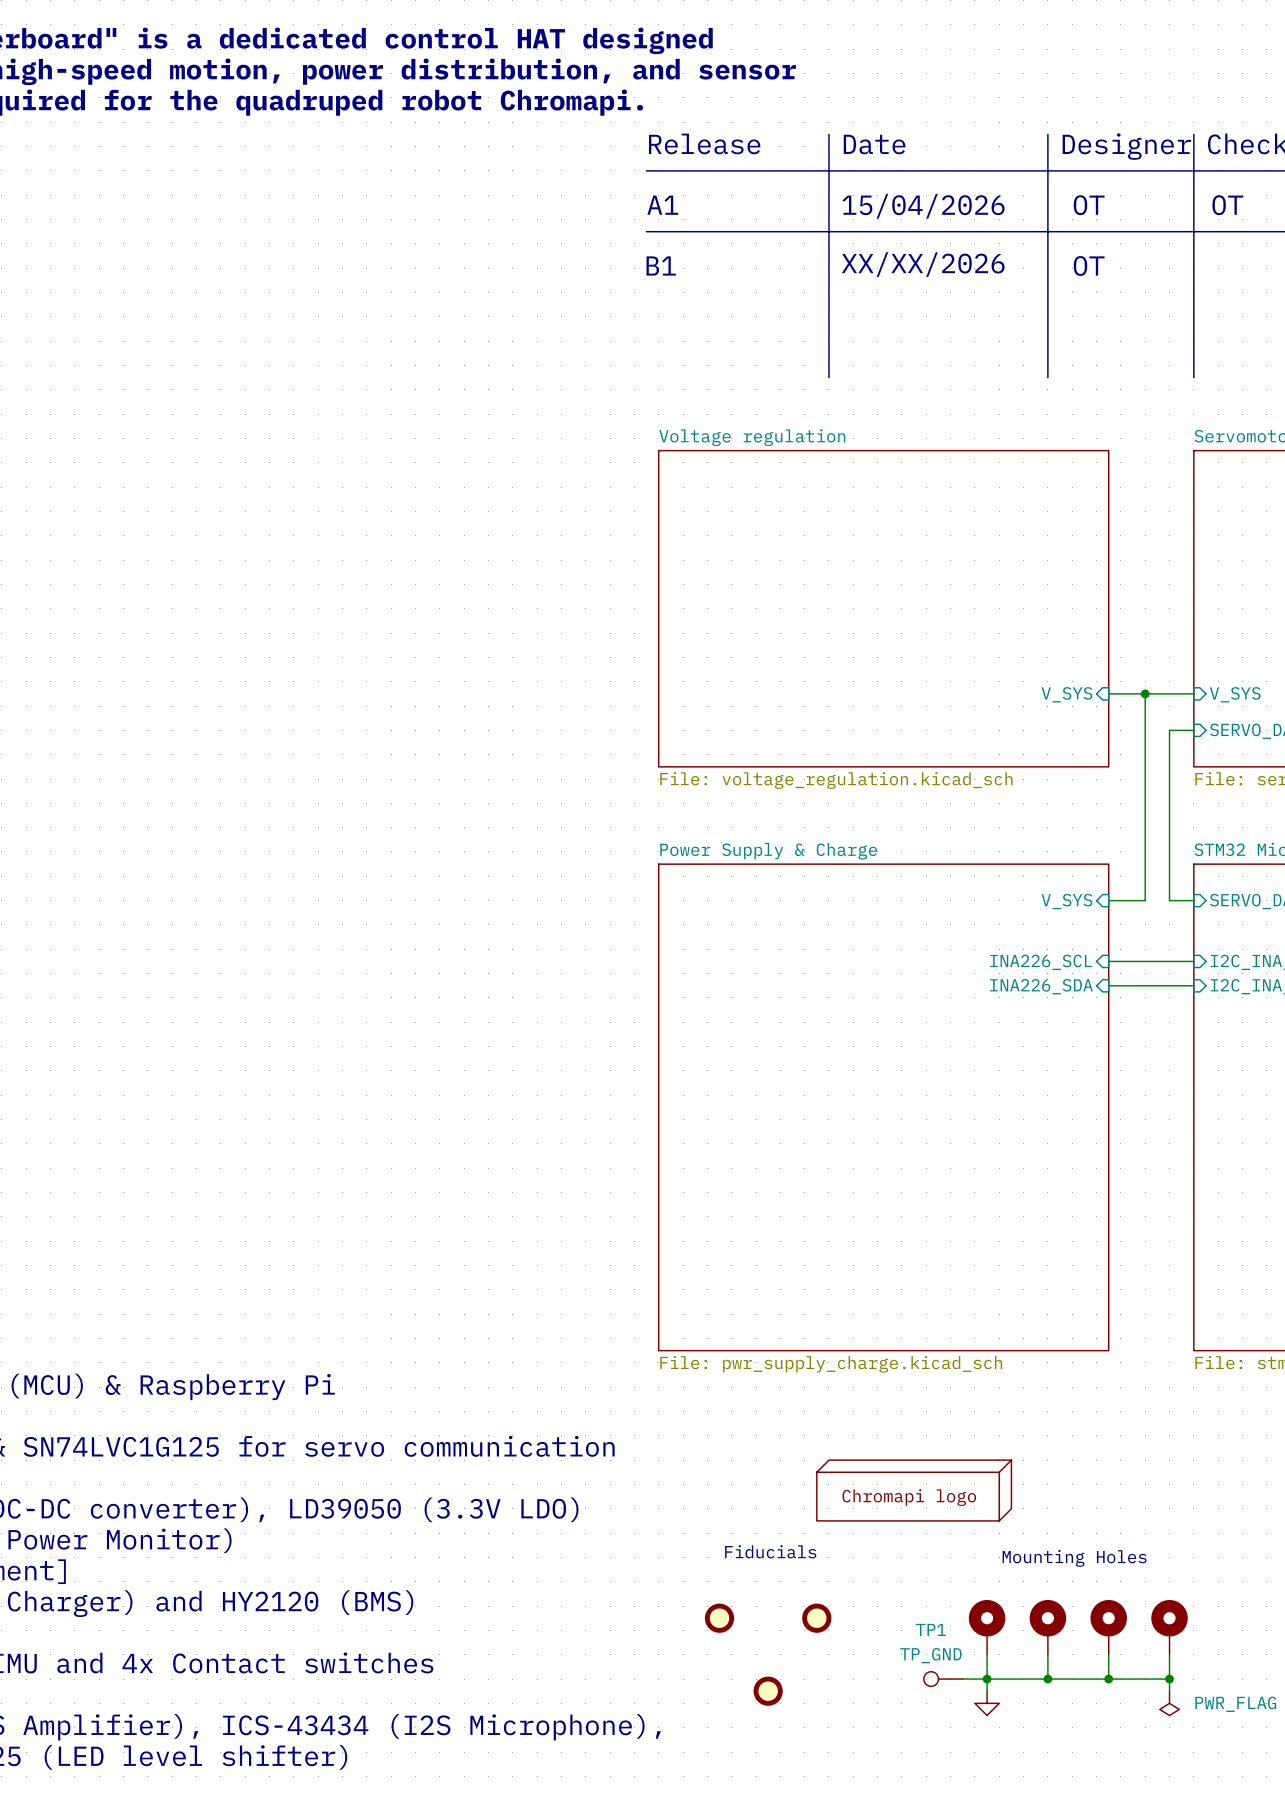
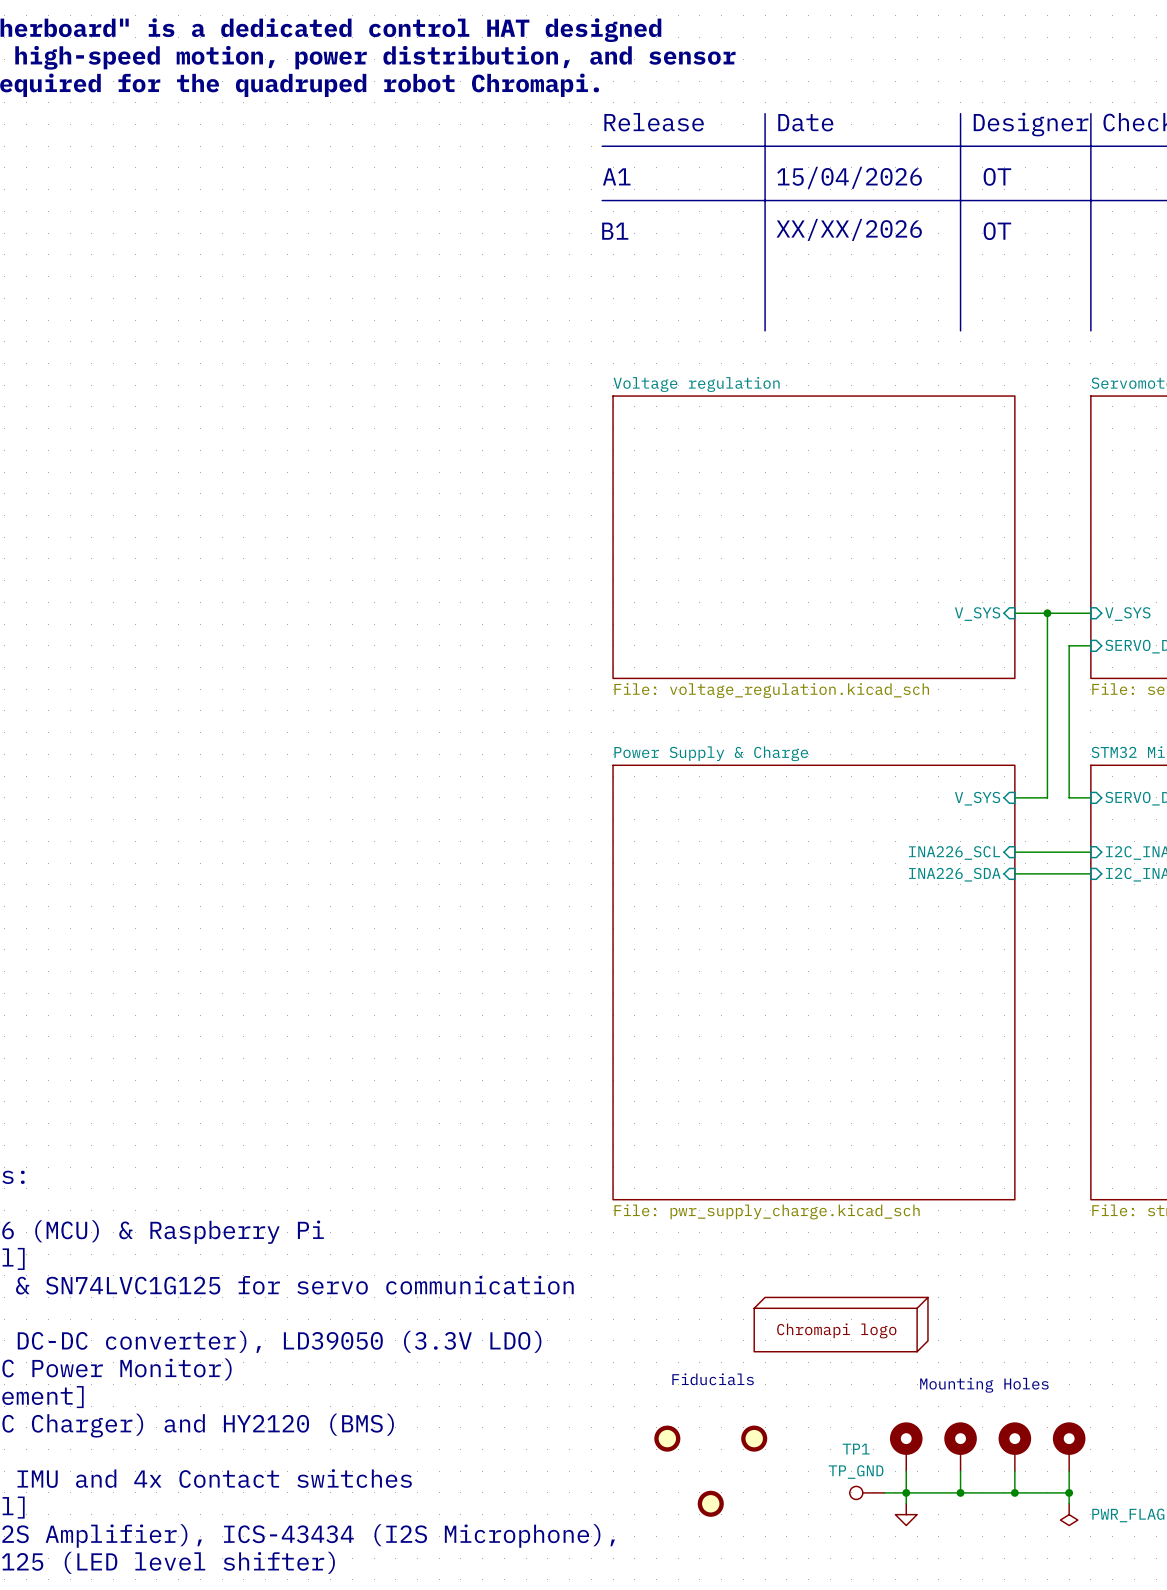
text: OT (1227, 205) -> none

